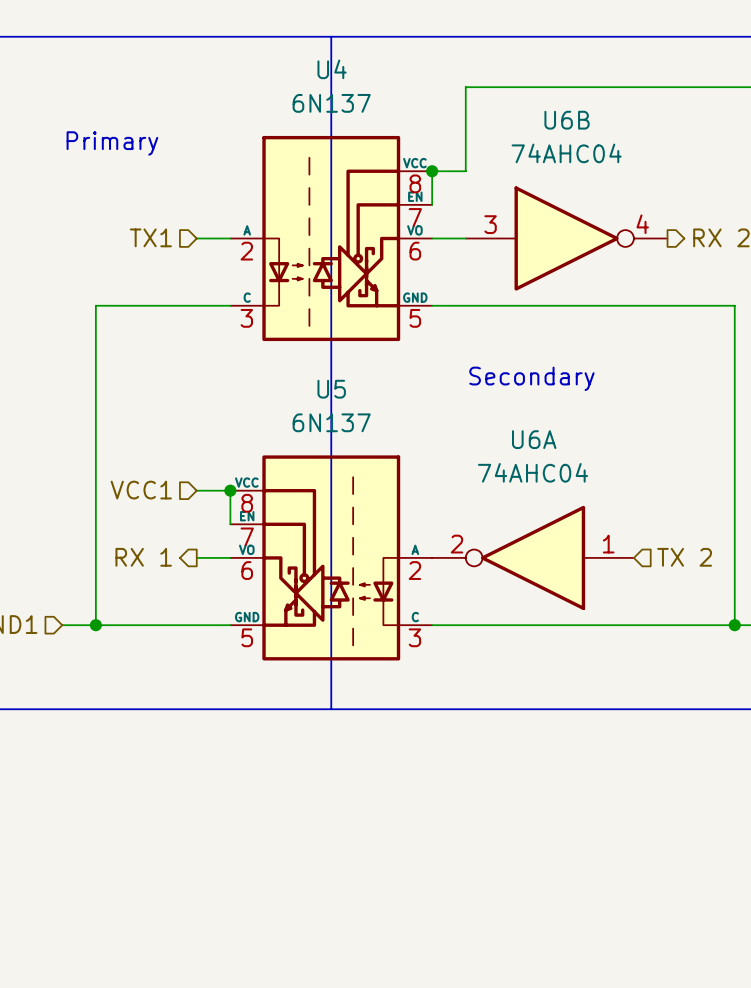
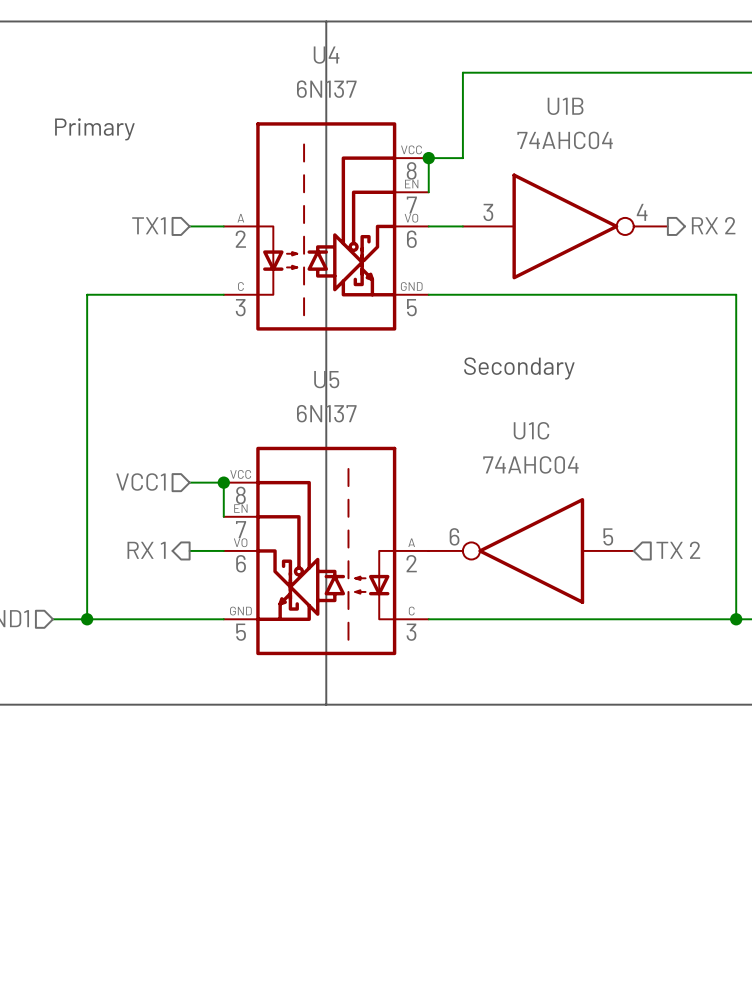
U6B name: U6B (567, 120) -> U1B (565, 106)
U6A name: U6A (534, 439) -> U1C (531, 430)
U6A pin number: 2 (456, 544) -> 6 (454, 536)
U6A pin number: 1 (608, 544) -> 5 (608, 536)

